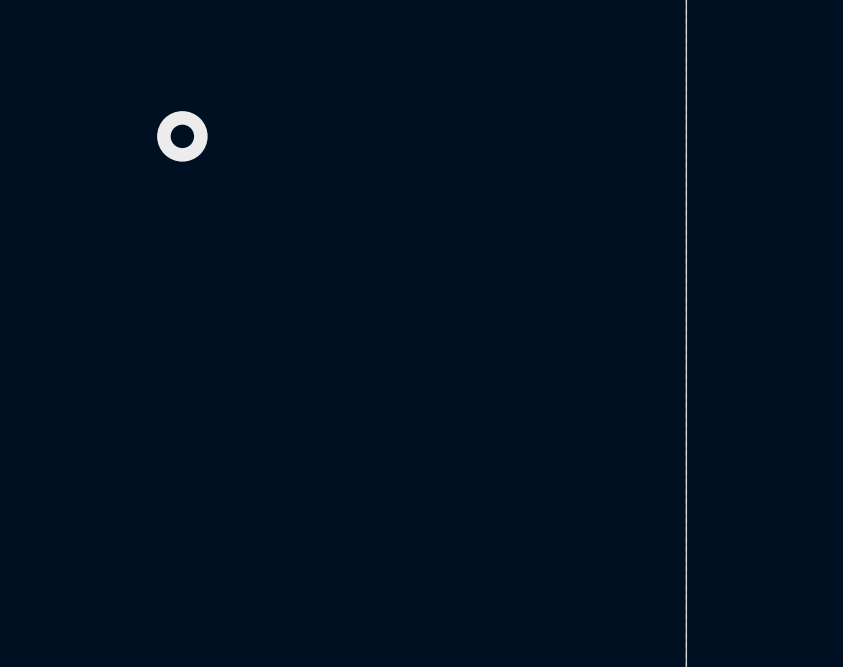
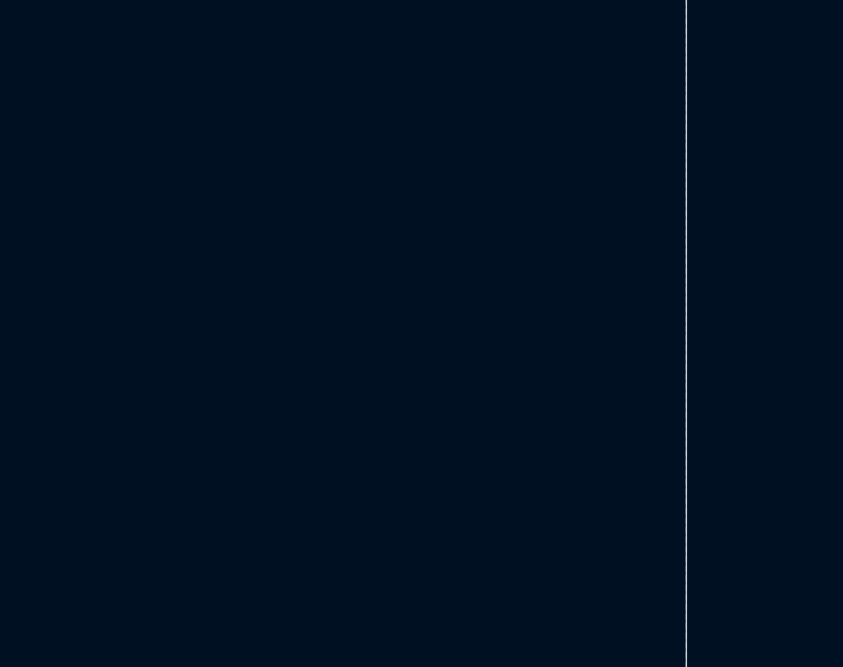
via: (182, 136) -> none

